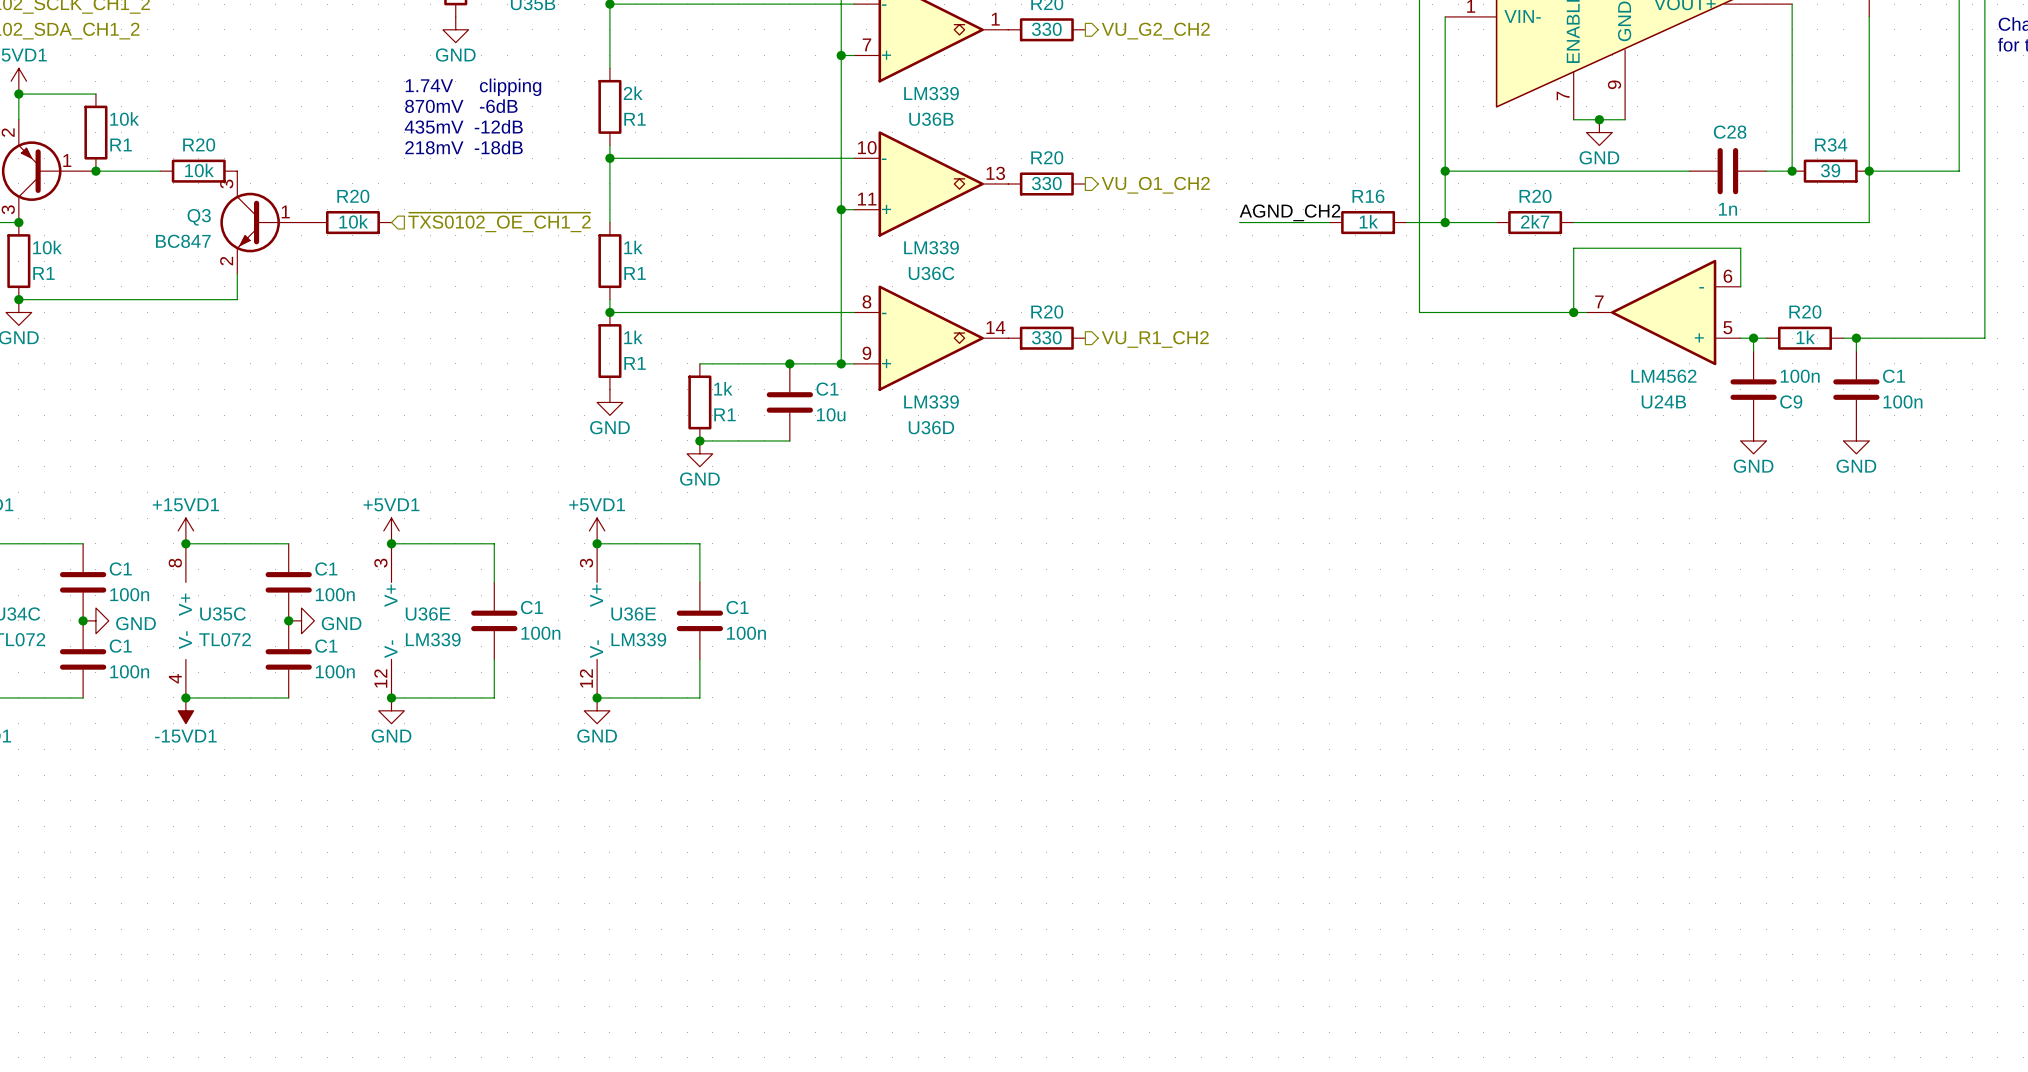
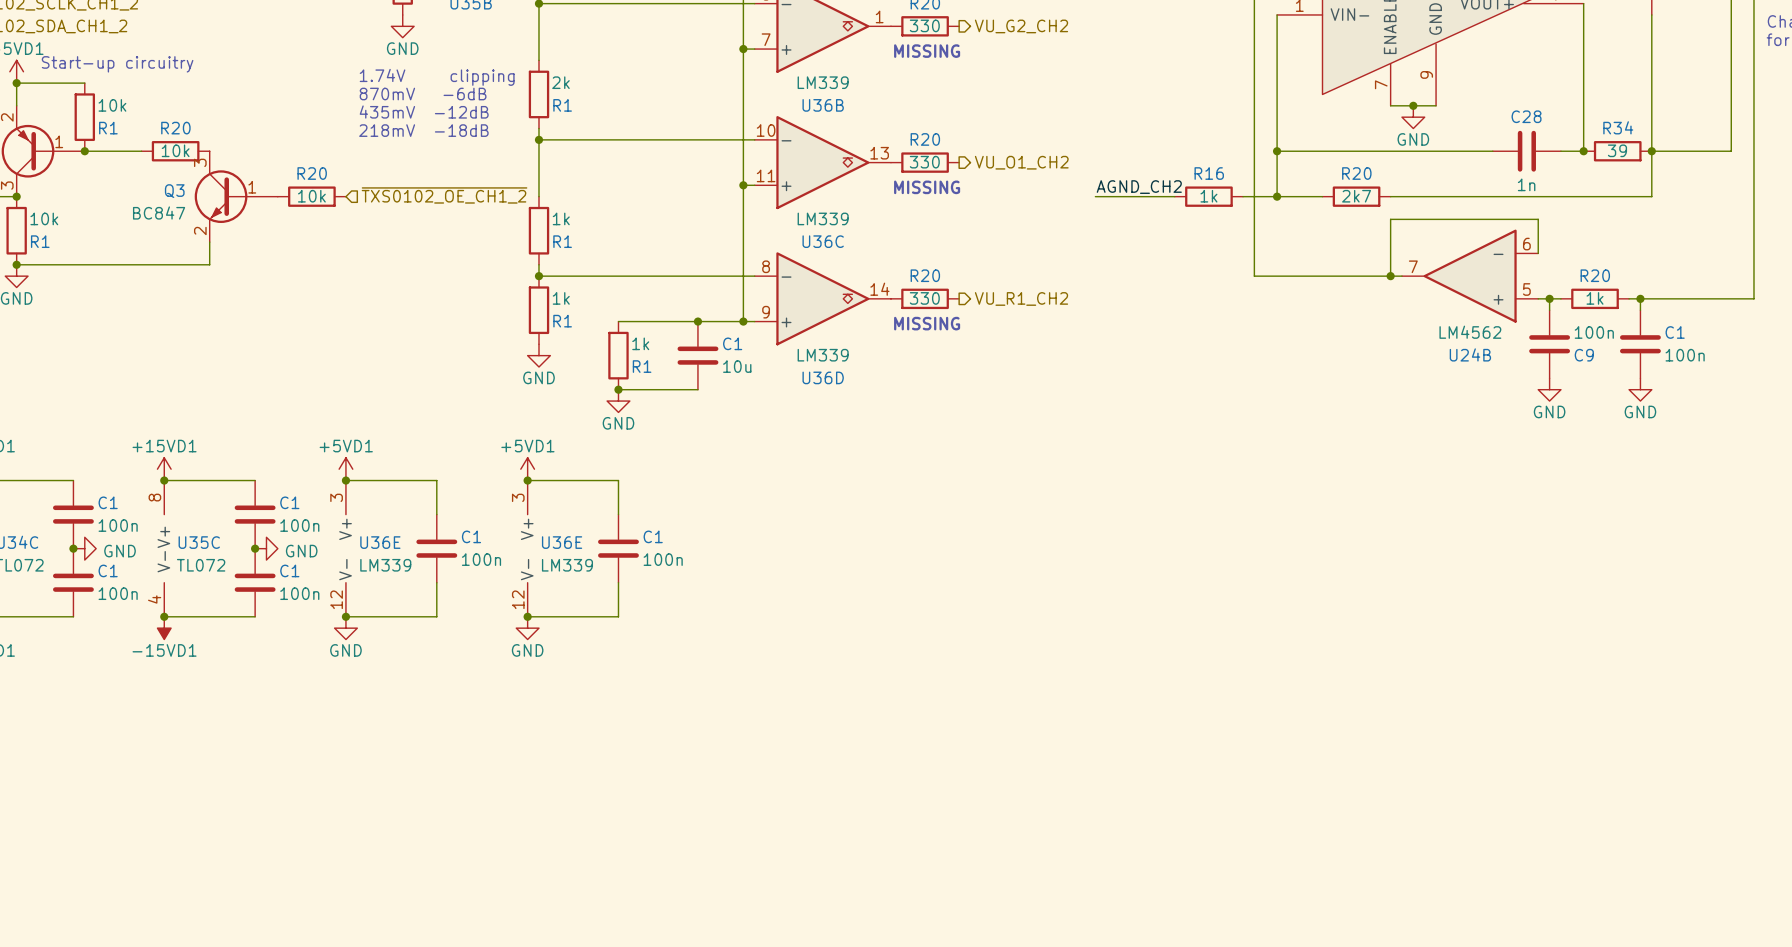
text: none -> MISSING (927, 51)
text: none -> Start-up circuitry (117, 64)
text: none -> MISSING (927, 187)
text: none -> MISSING (927, 323)

